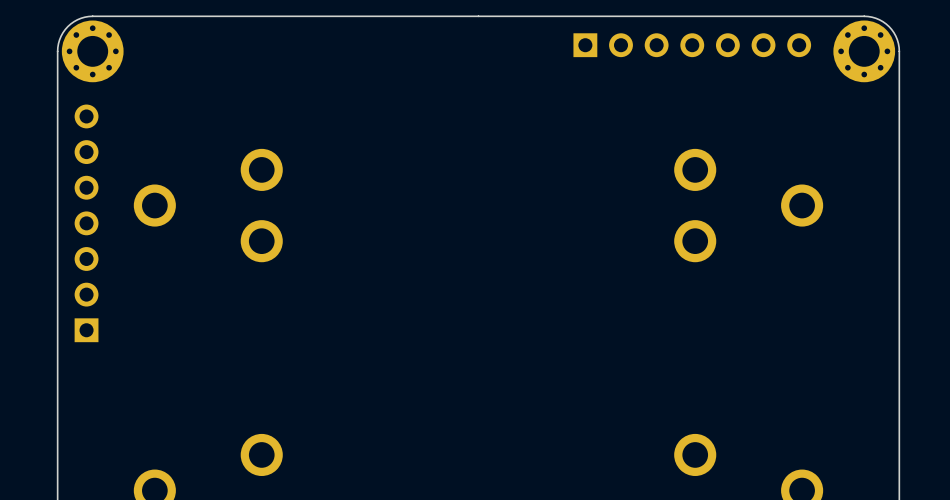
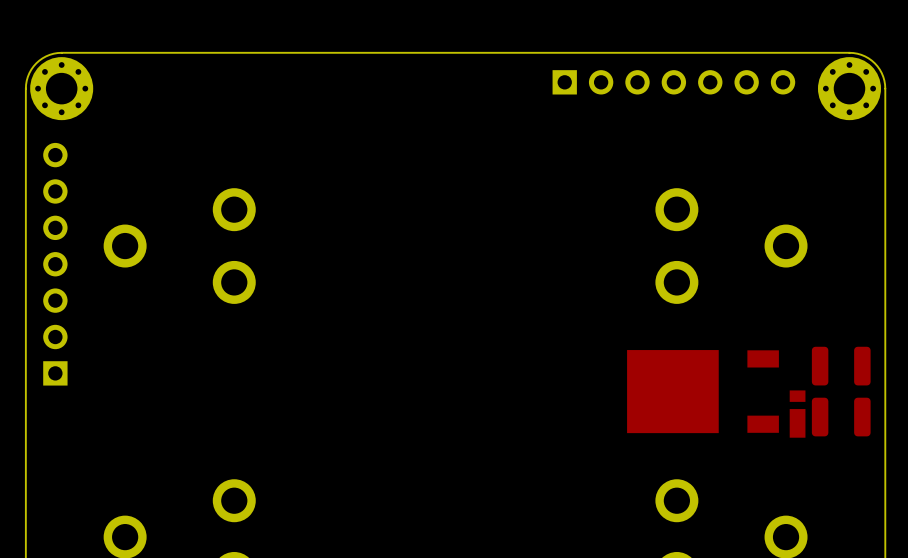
part: none -> (841, 366)
part: none -> (702, 391)
part: none -> (797, 414)
part: none -> (841, 417)

